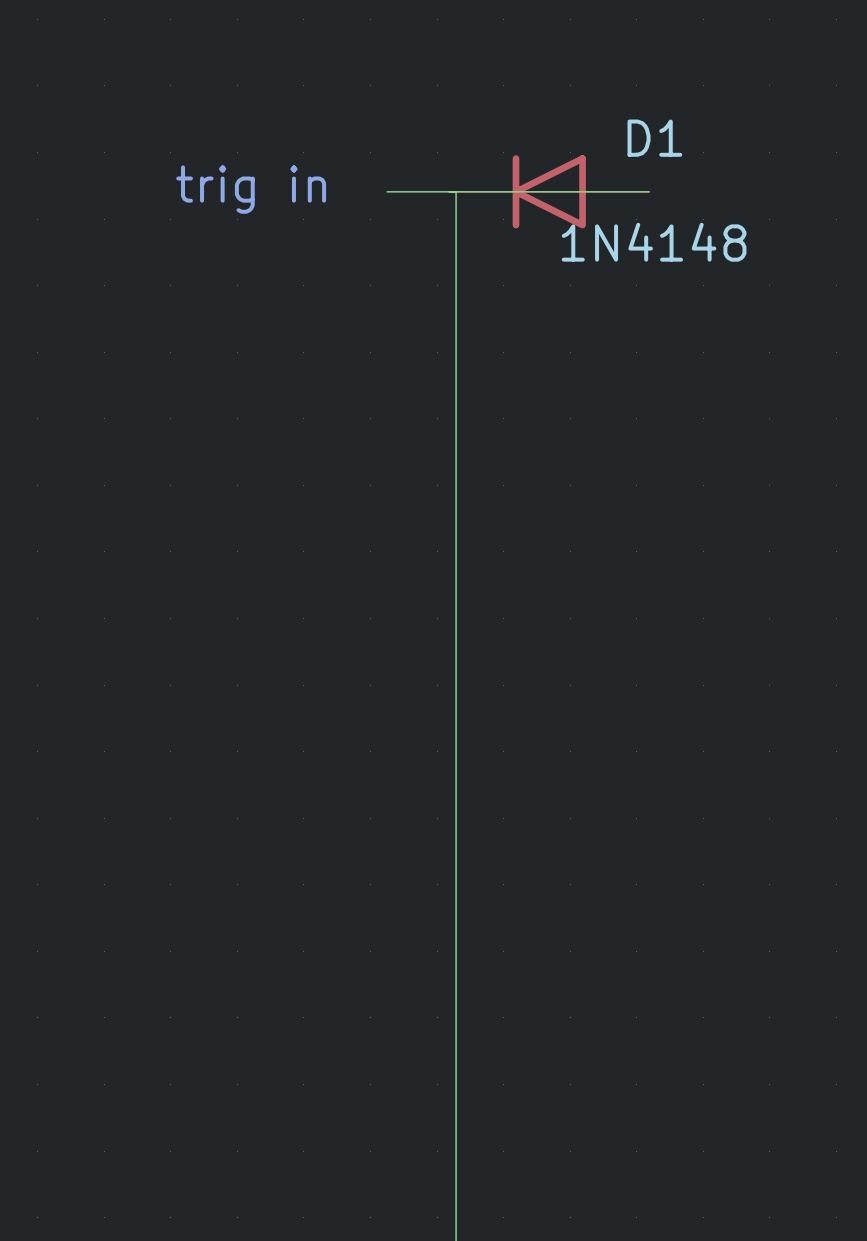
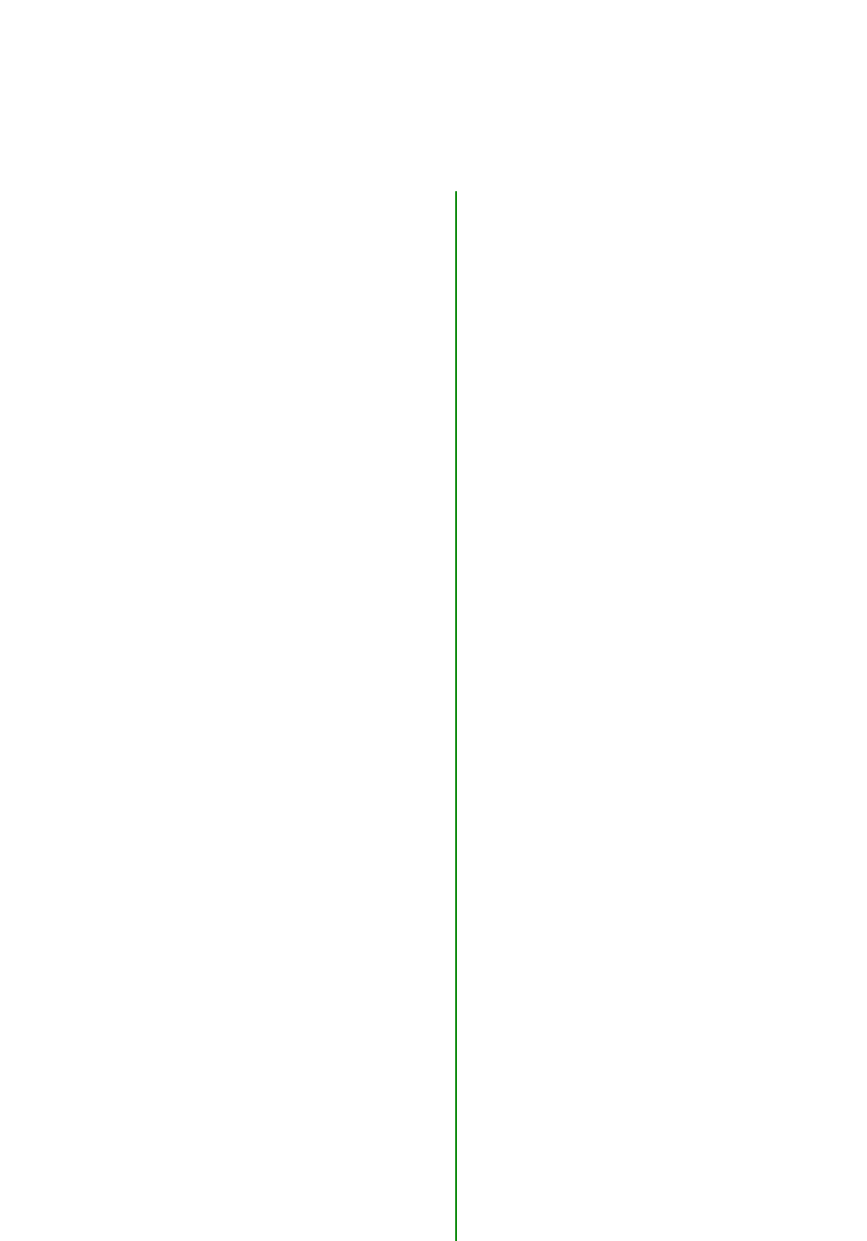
text: trig in (251, 189) -> none
wire: (387, 191) (649, 191) -> none
D1: 1N4148 (549, 191) -> none

